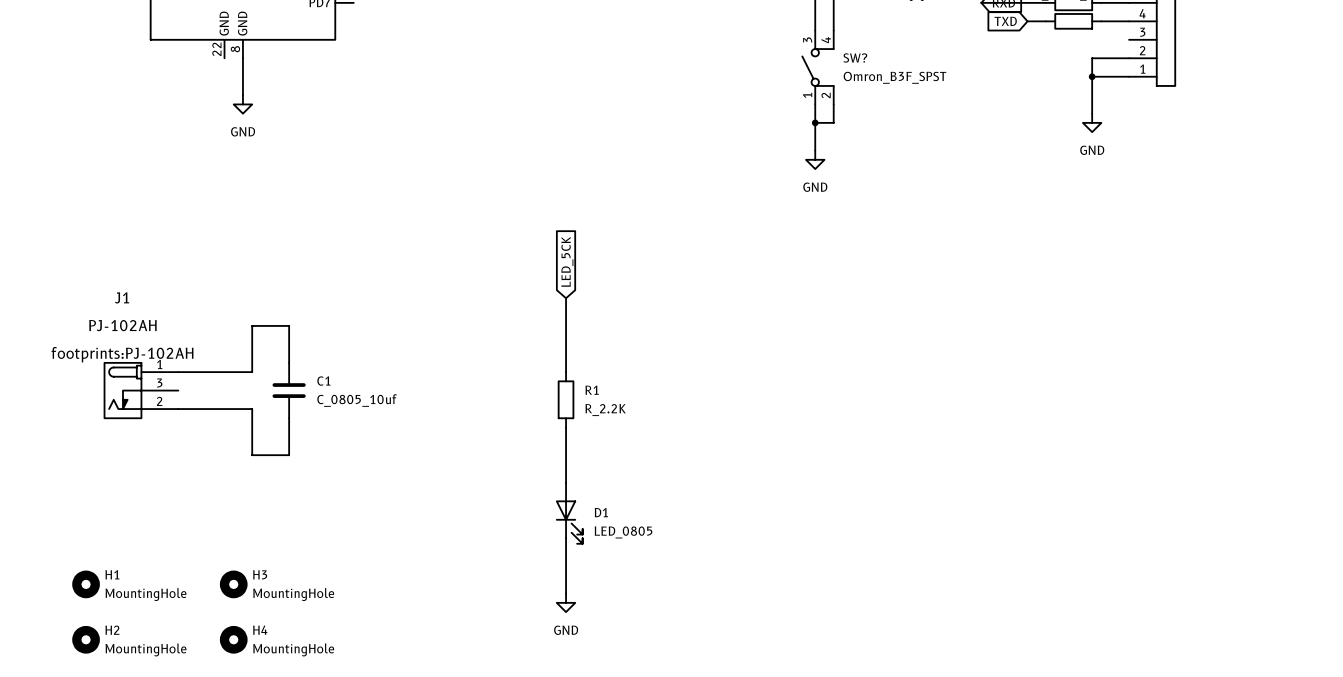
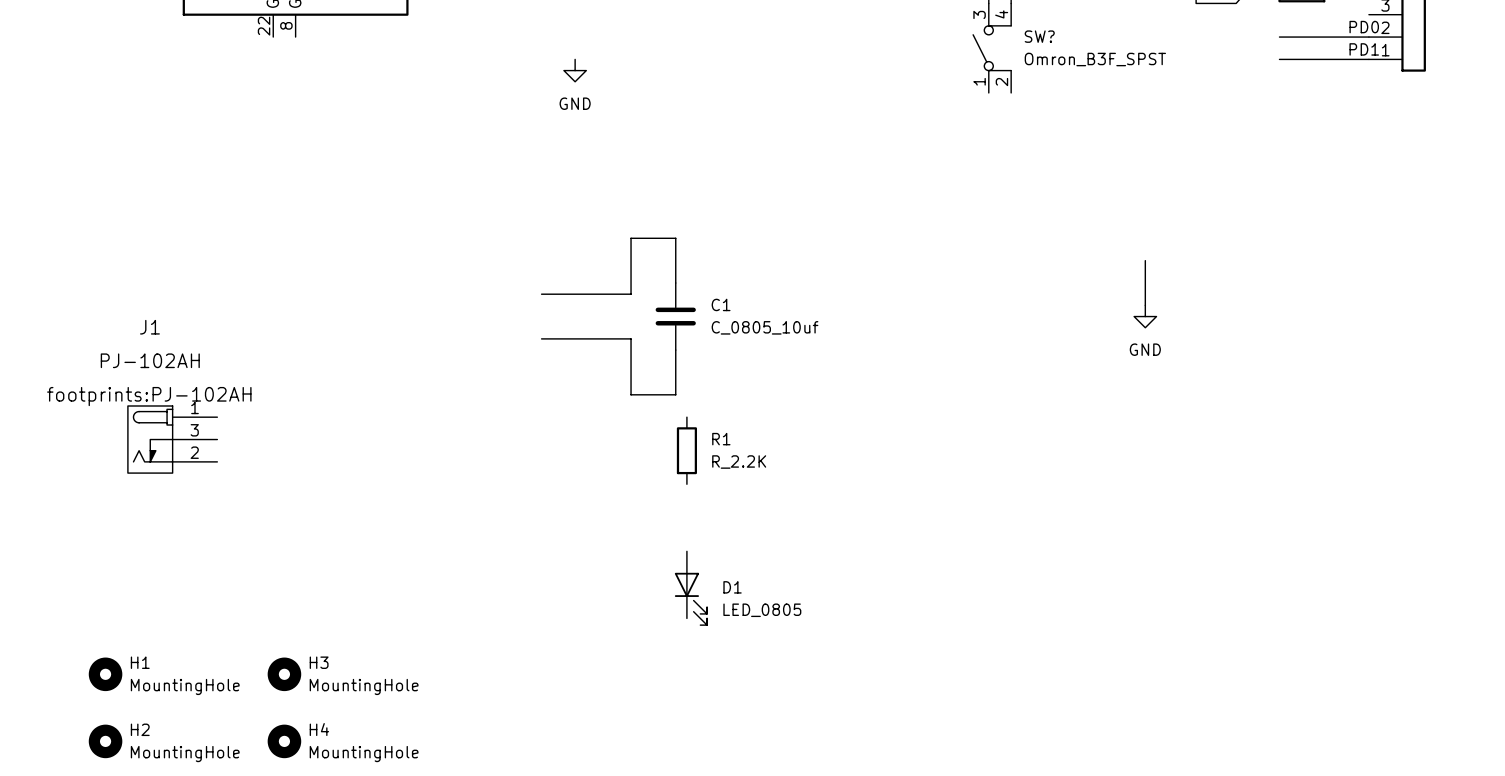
label: none -> PD0 (1364, 27)
wire: (242, 58) (242, 95) -> none
wire: (1092, 58) (1092, 113) -> (1324, 37) (1279, 37)
label: none -> PD1 (1364, 49)
wire: none -> (1279, 59) (1324, 59)
junction: (1092, 76) -> none
power symbol: none -> GND (575, 70)
power symbol: GND (242, 104) -> none
wire: (815, 104) (815, 150) -> none
wire: (833, 104) (833, 122) (815, 122) -> none
junction: (815, 122) -> none
power symbol: GND (1092, 122) -> none
power symbol: GND (815, 159) -> none
wire: none -> (1145, 260) (1145, 305)
wire: none -> (675, 283) (675, 238) (631, 238) (631, 294) (541, 294)
global label: LED_5CK (567, 261) -> none
power symbol: none -> GND (1145, 316)
wire: (566, 298) (566, 372) -> none
wire: none -> (541, 338) (631, 338) (631, 394) (675, 394) (675, 350)
wire: (289, 362) (289, 325) (252, 325) (252, 372) (178, 372) -> none
C1 position: (289, 390) -> (675, 316)
wire: (178, 409) (252, 409) (252, 455) (289, 455) (289, 418) -> none
wire: (566, 427) (566, 482) -> none
wire: (566, 538) (566, 593) -> none
power symbol: GND (566, 602) -> none

